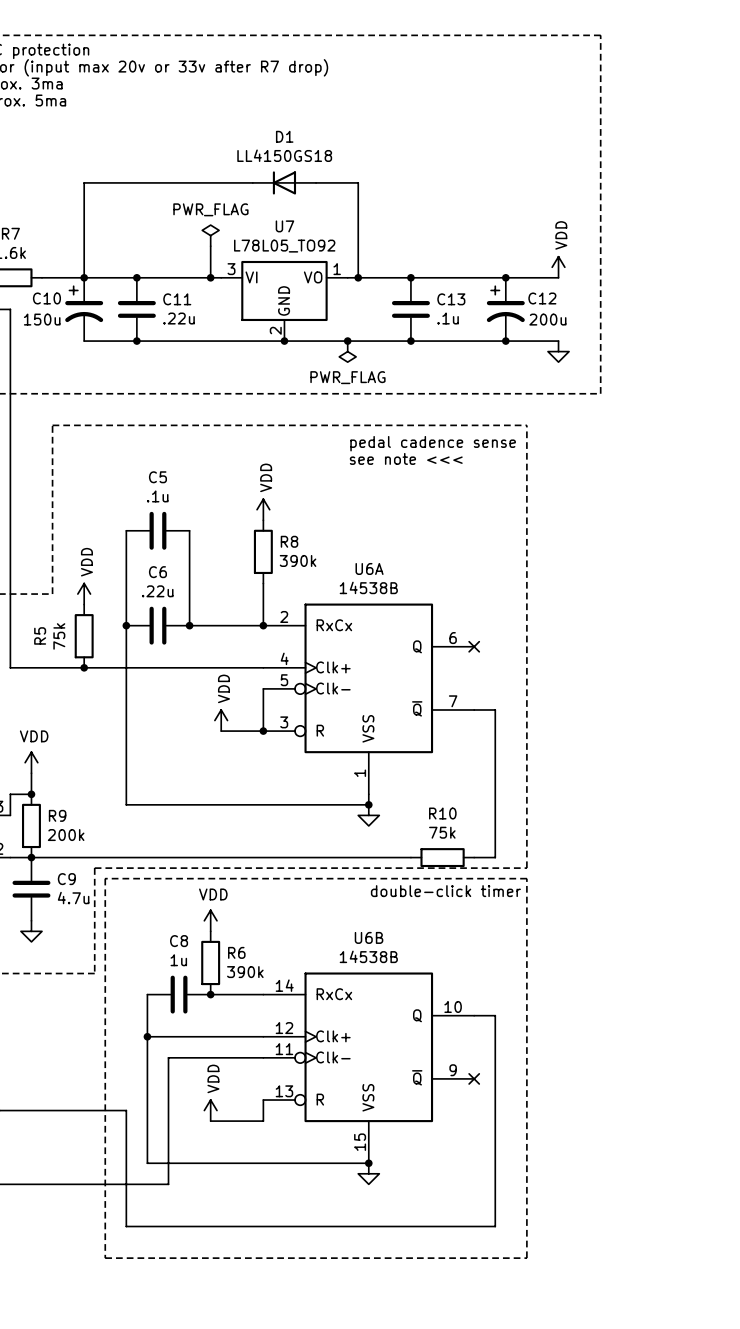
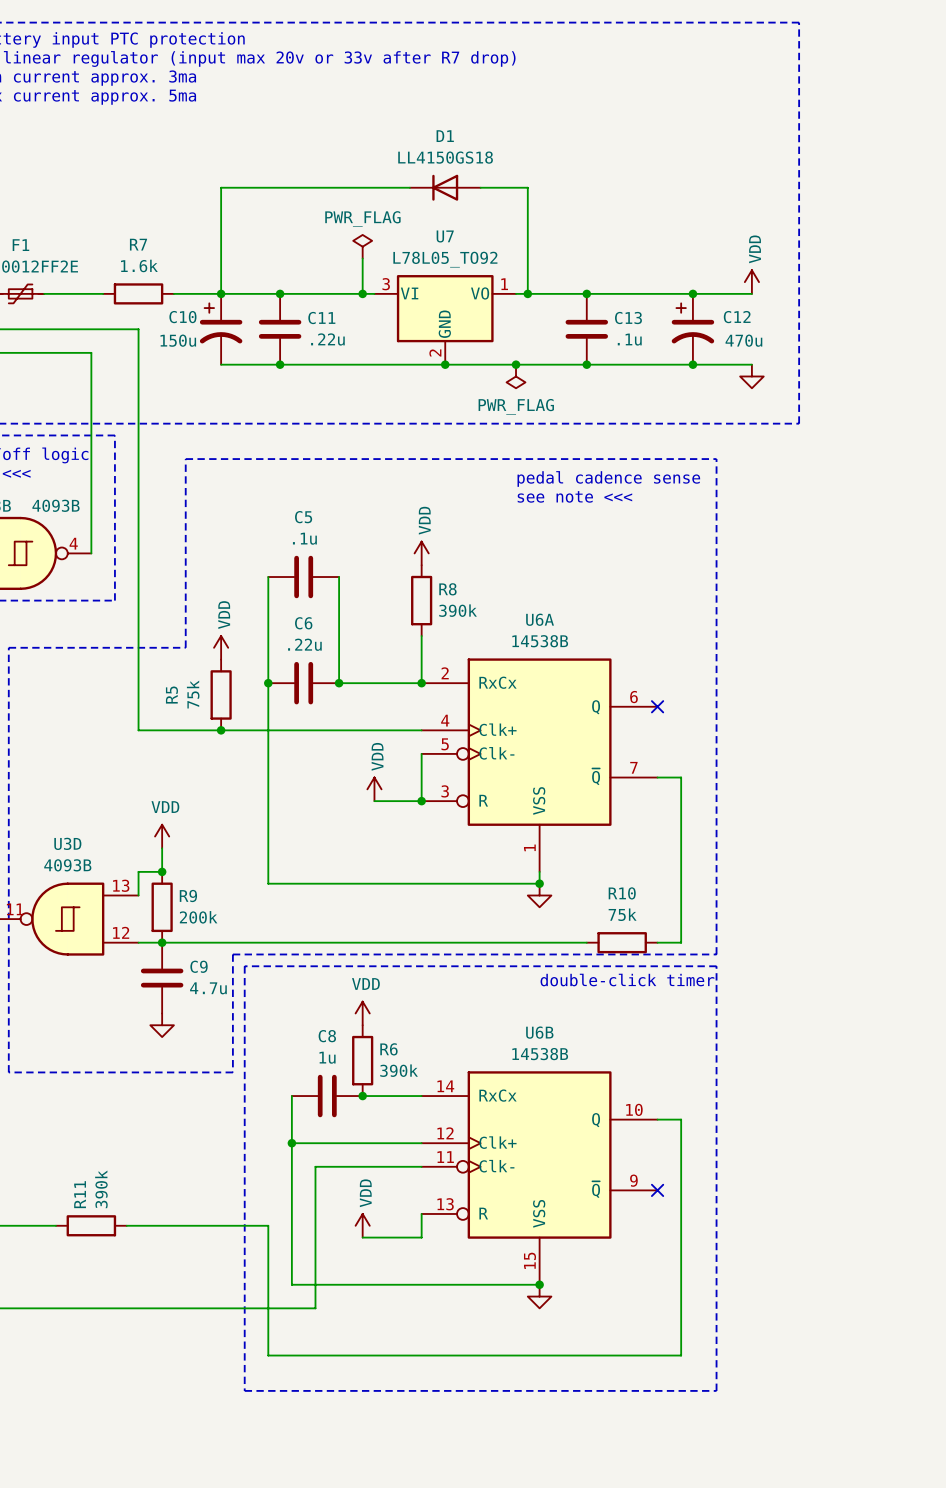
C12 value: 200u (547, 319) -> 470u (743, 340)

